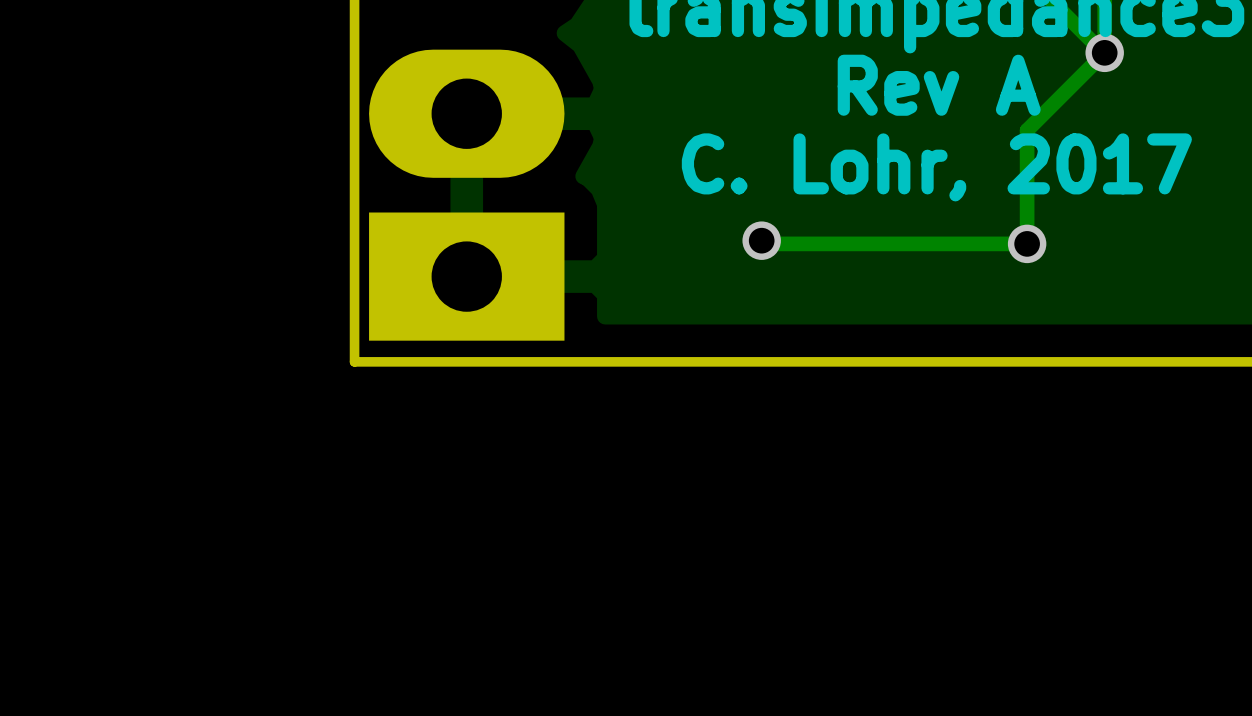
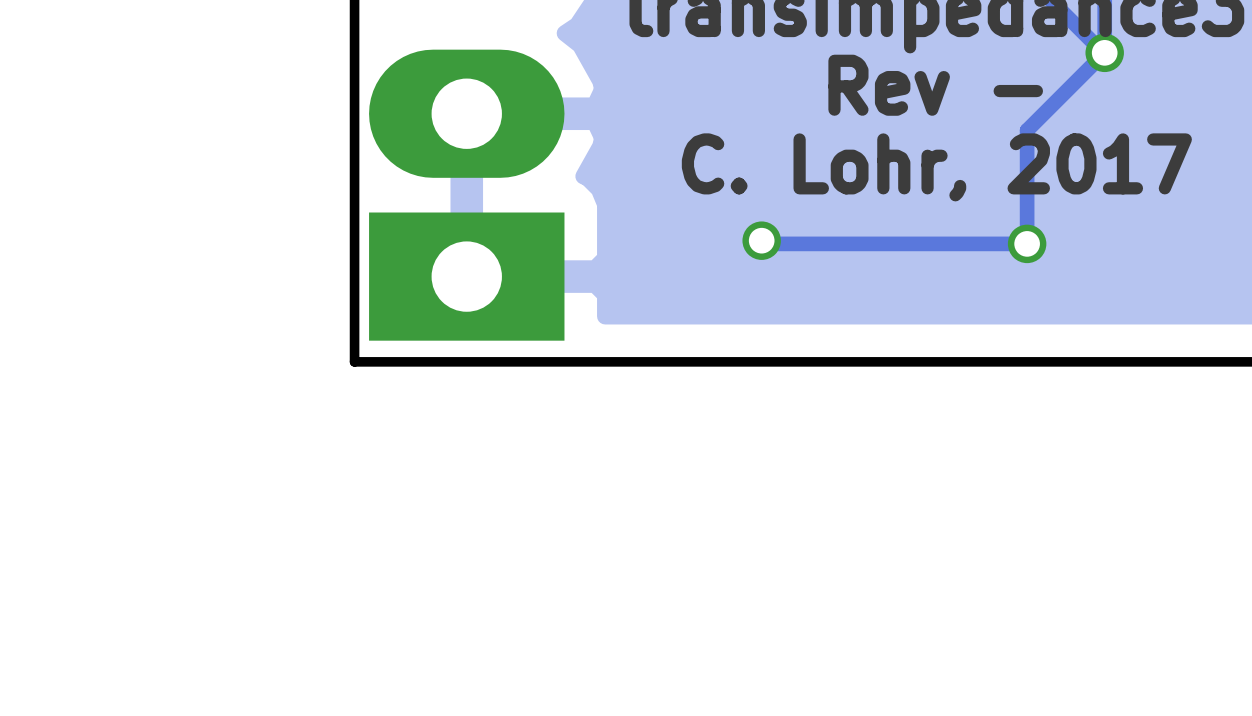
text: Rev A (939, 85) -> Rev - (935, 85)

